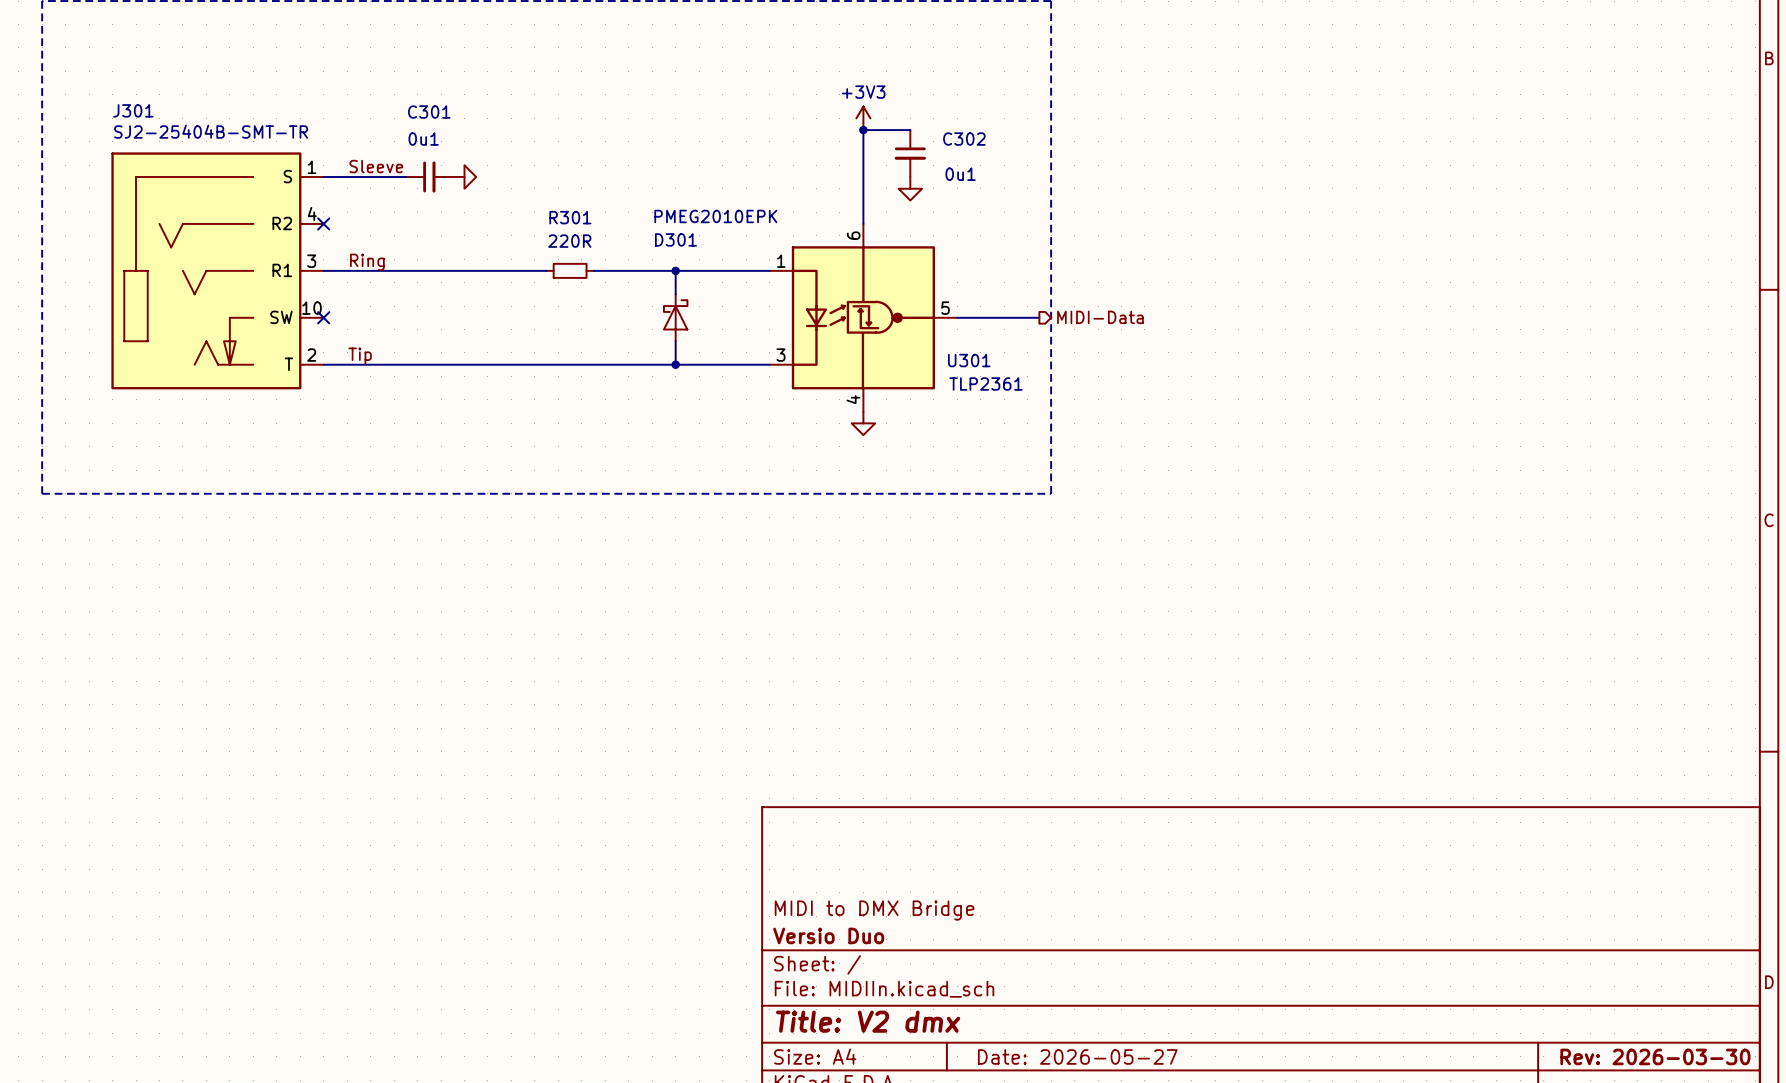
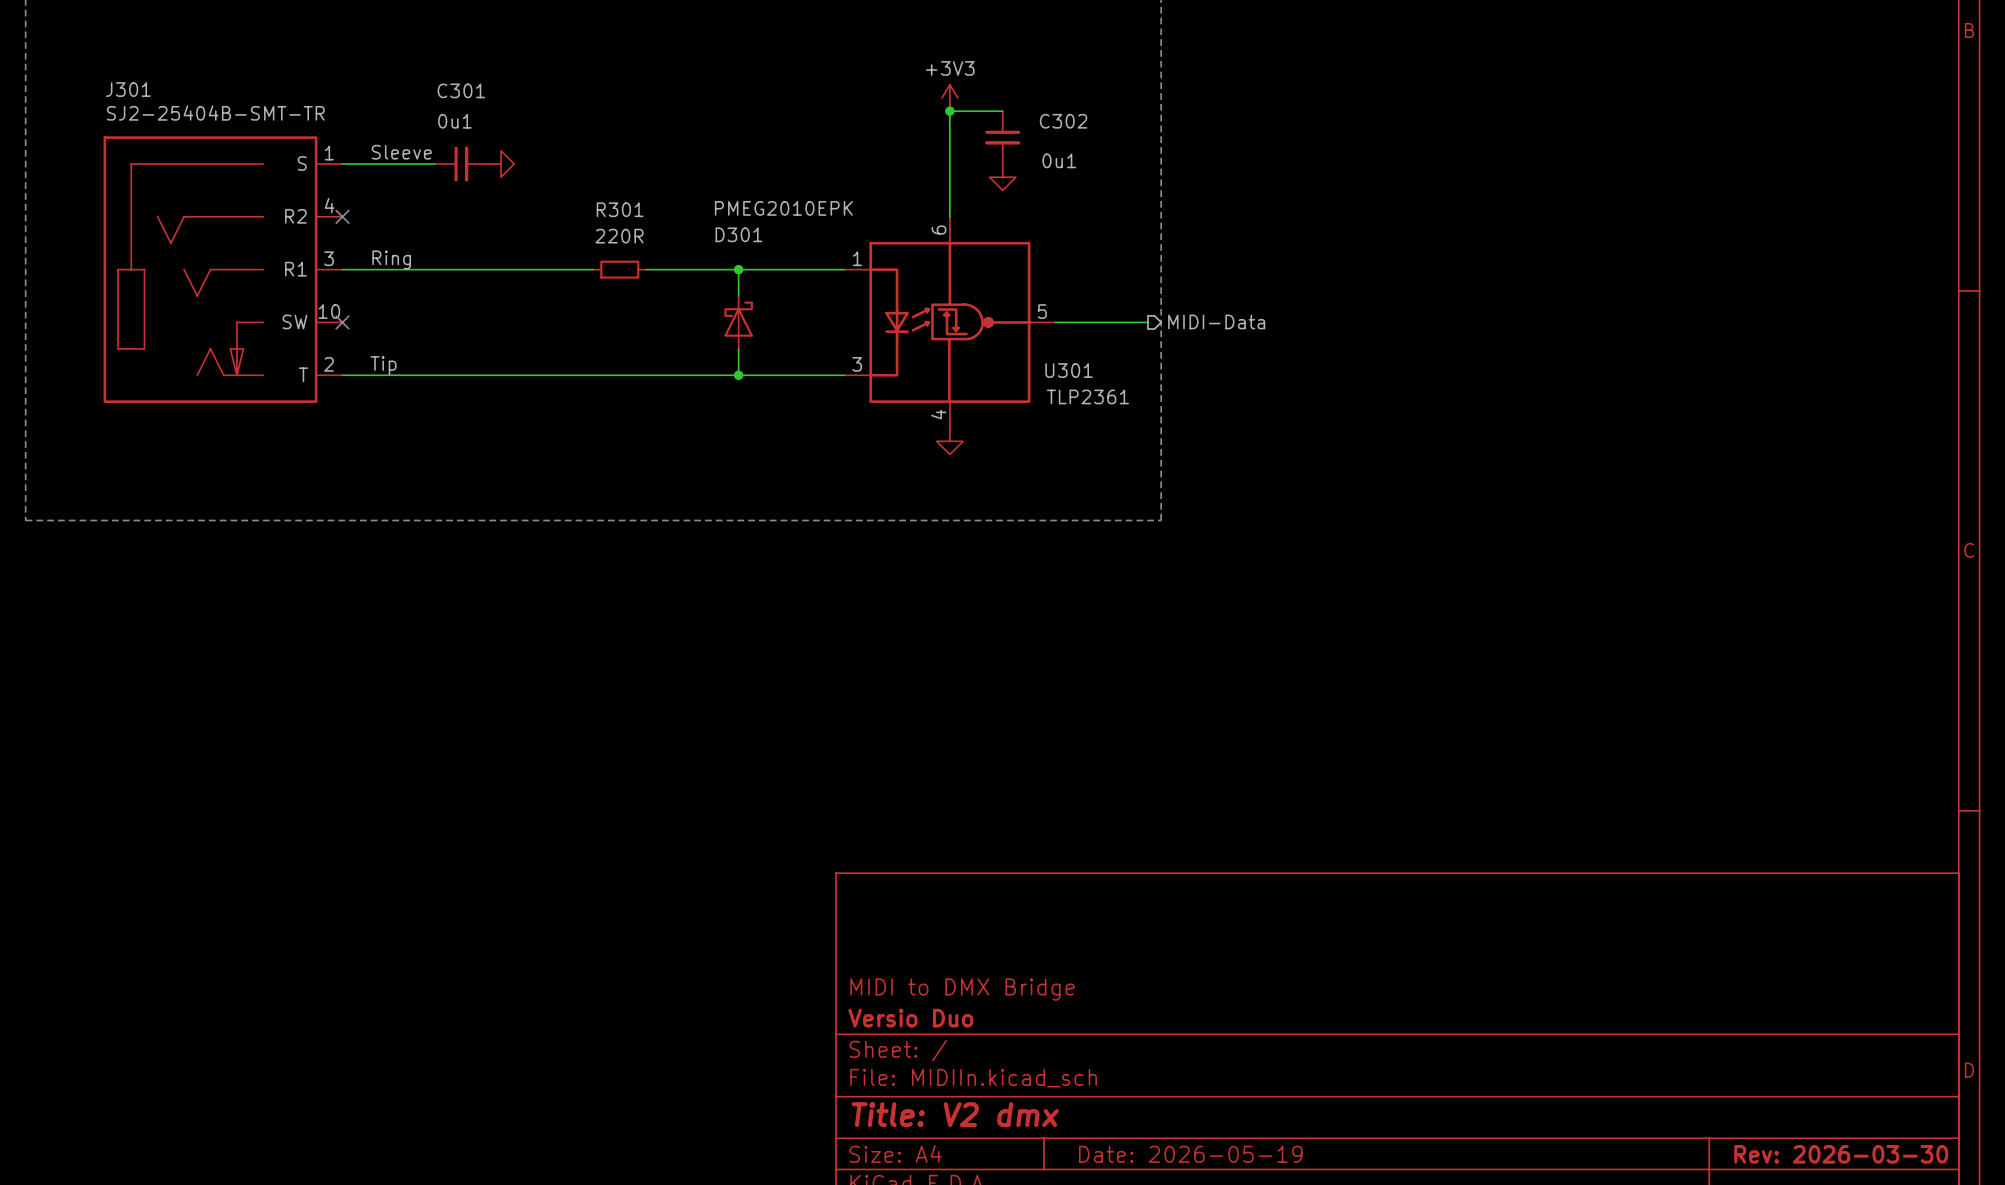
title block: Date: 2026-05-27 (1077, 1056) -> Date: 2026-05-19 (1190, 1154)

